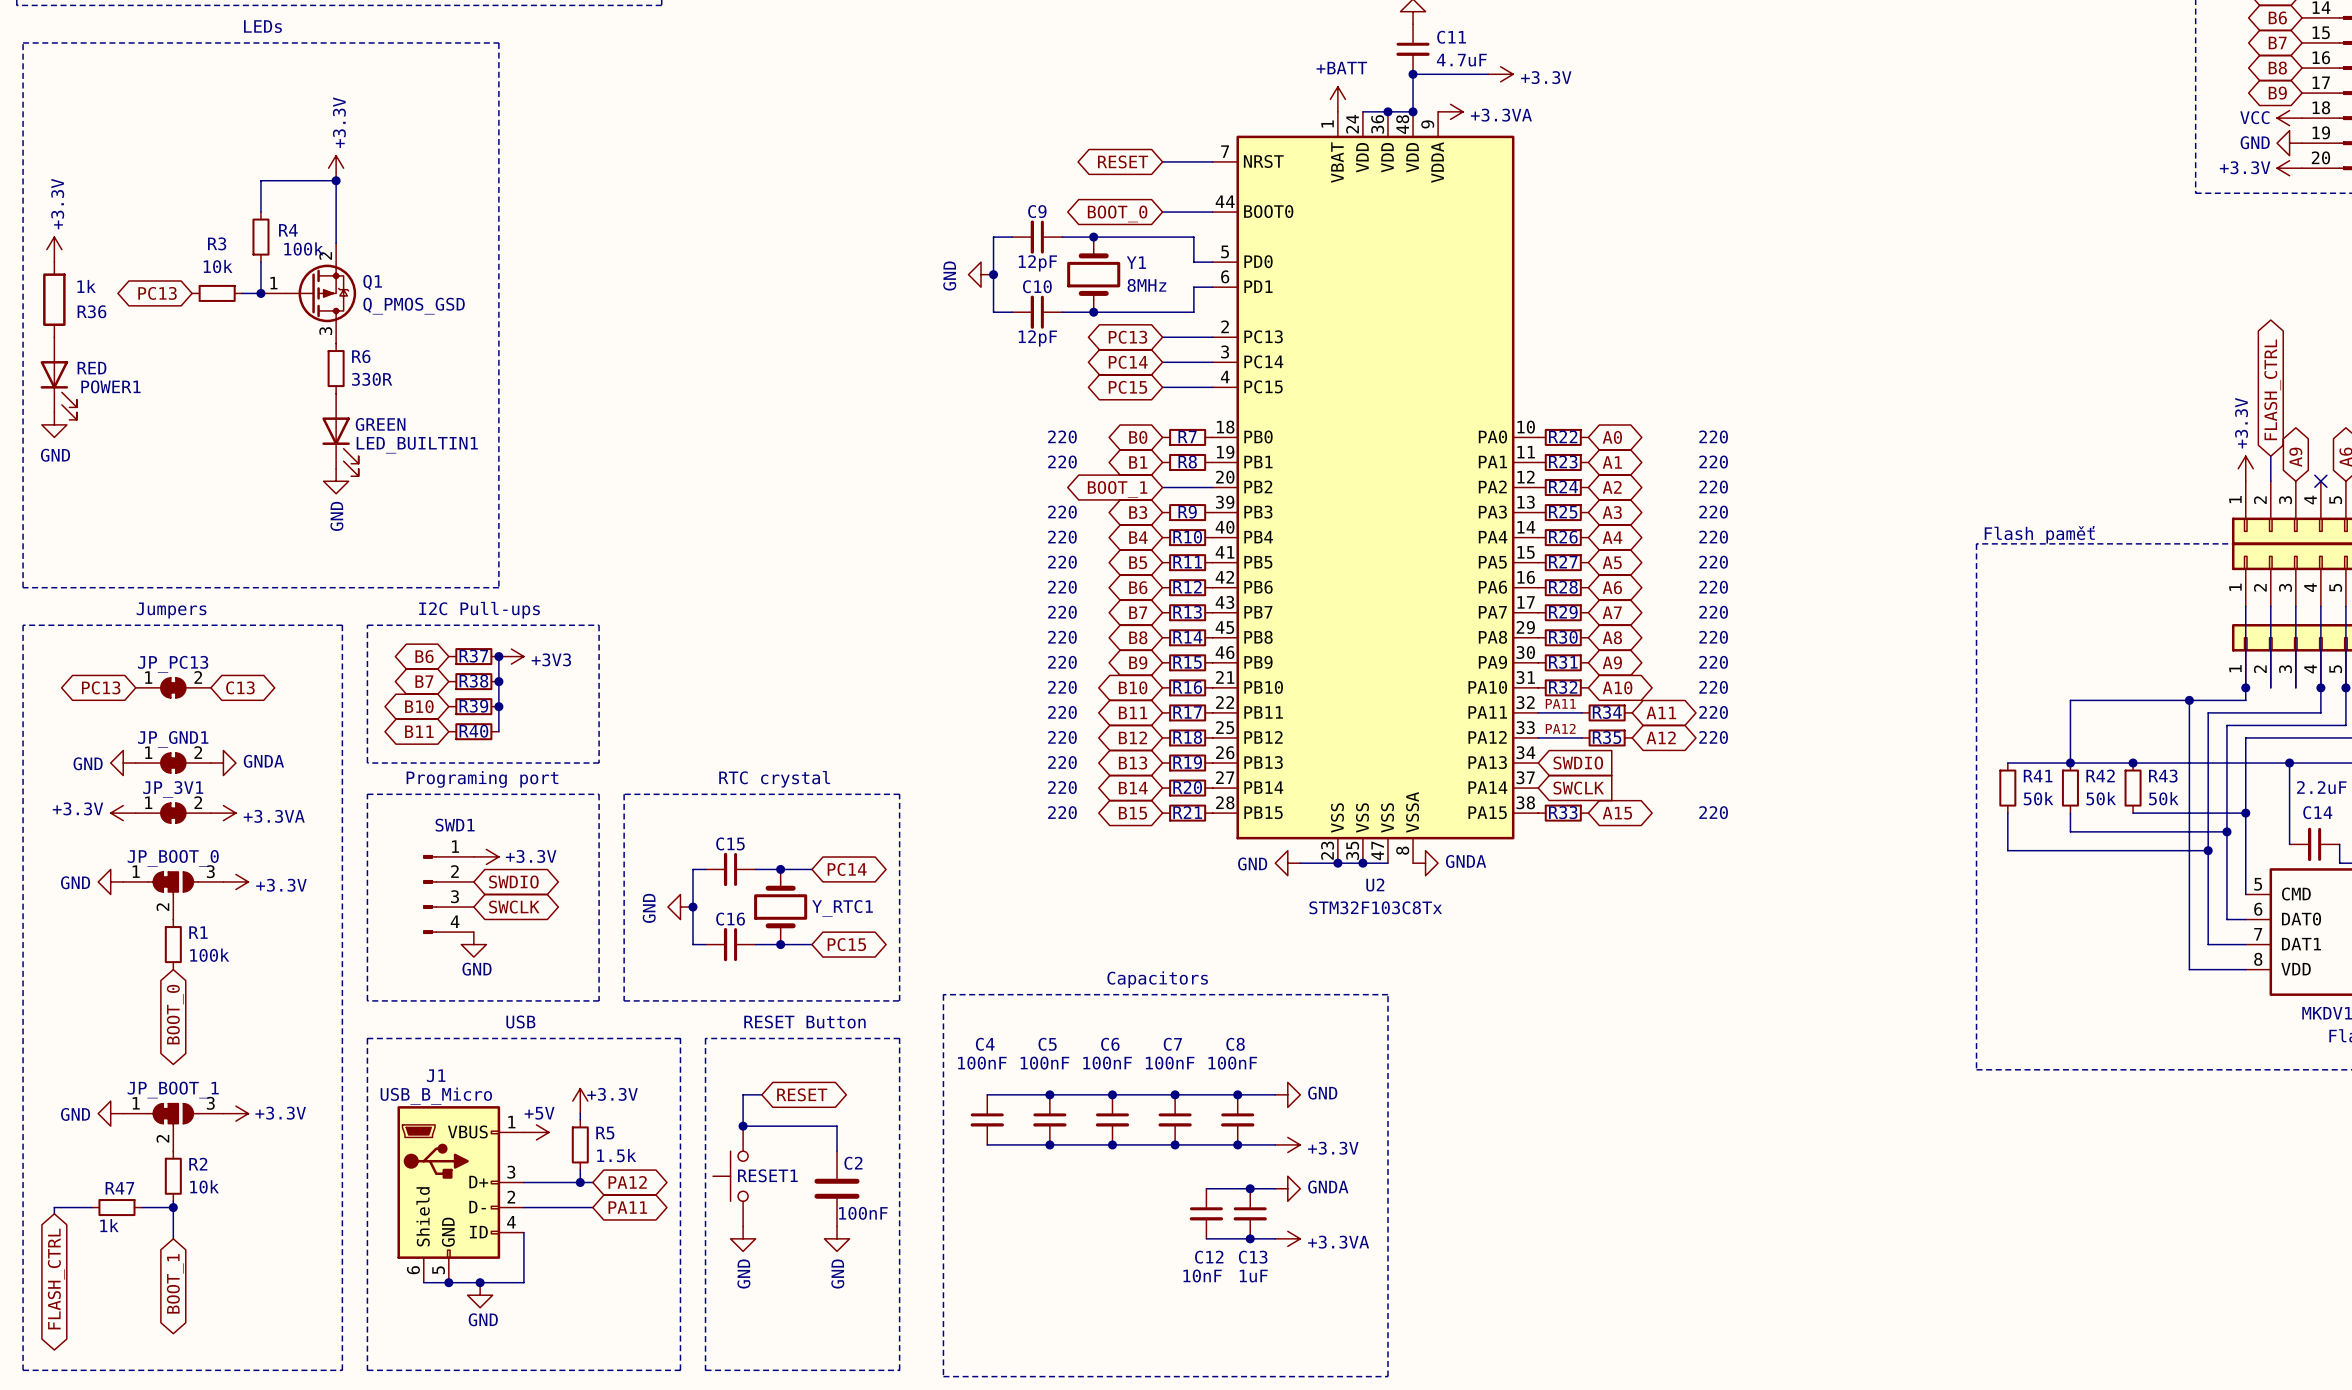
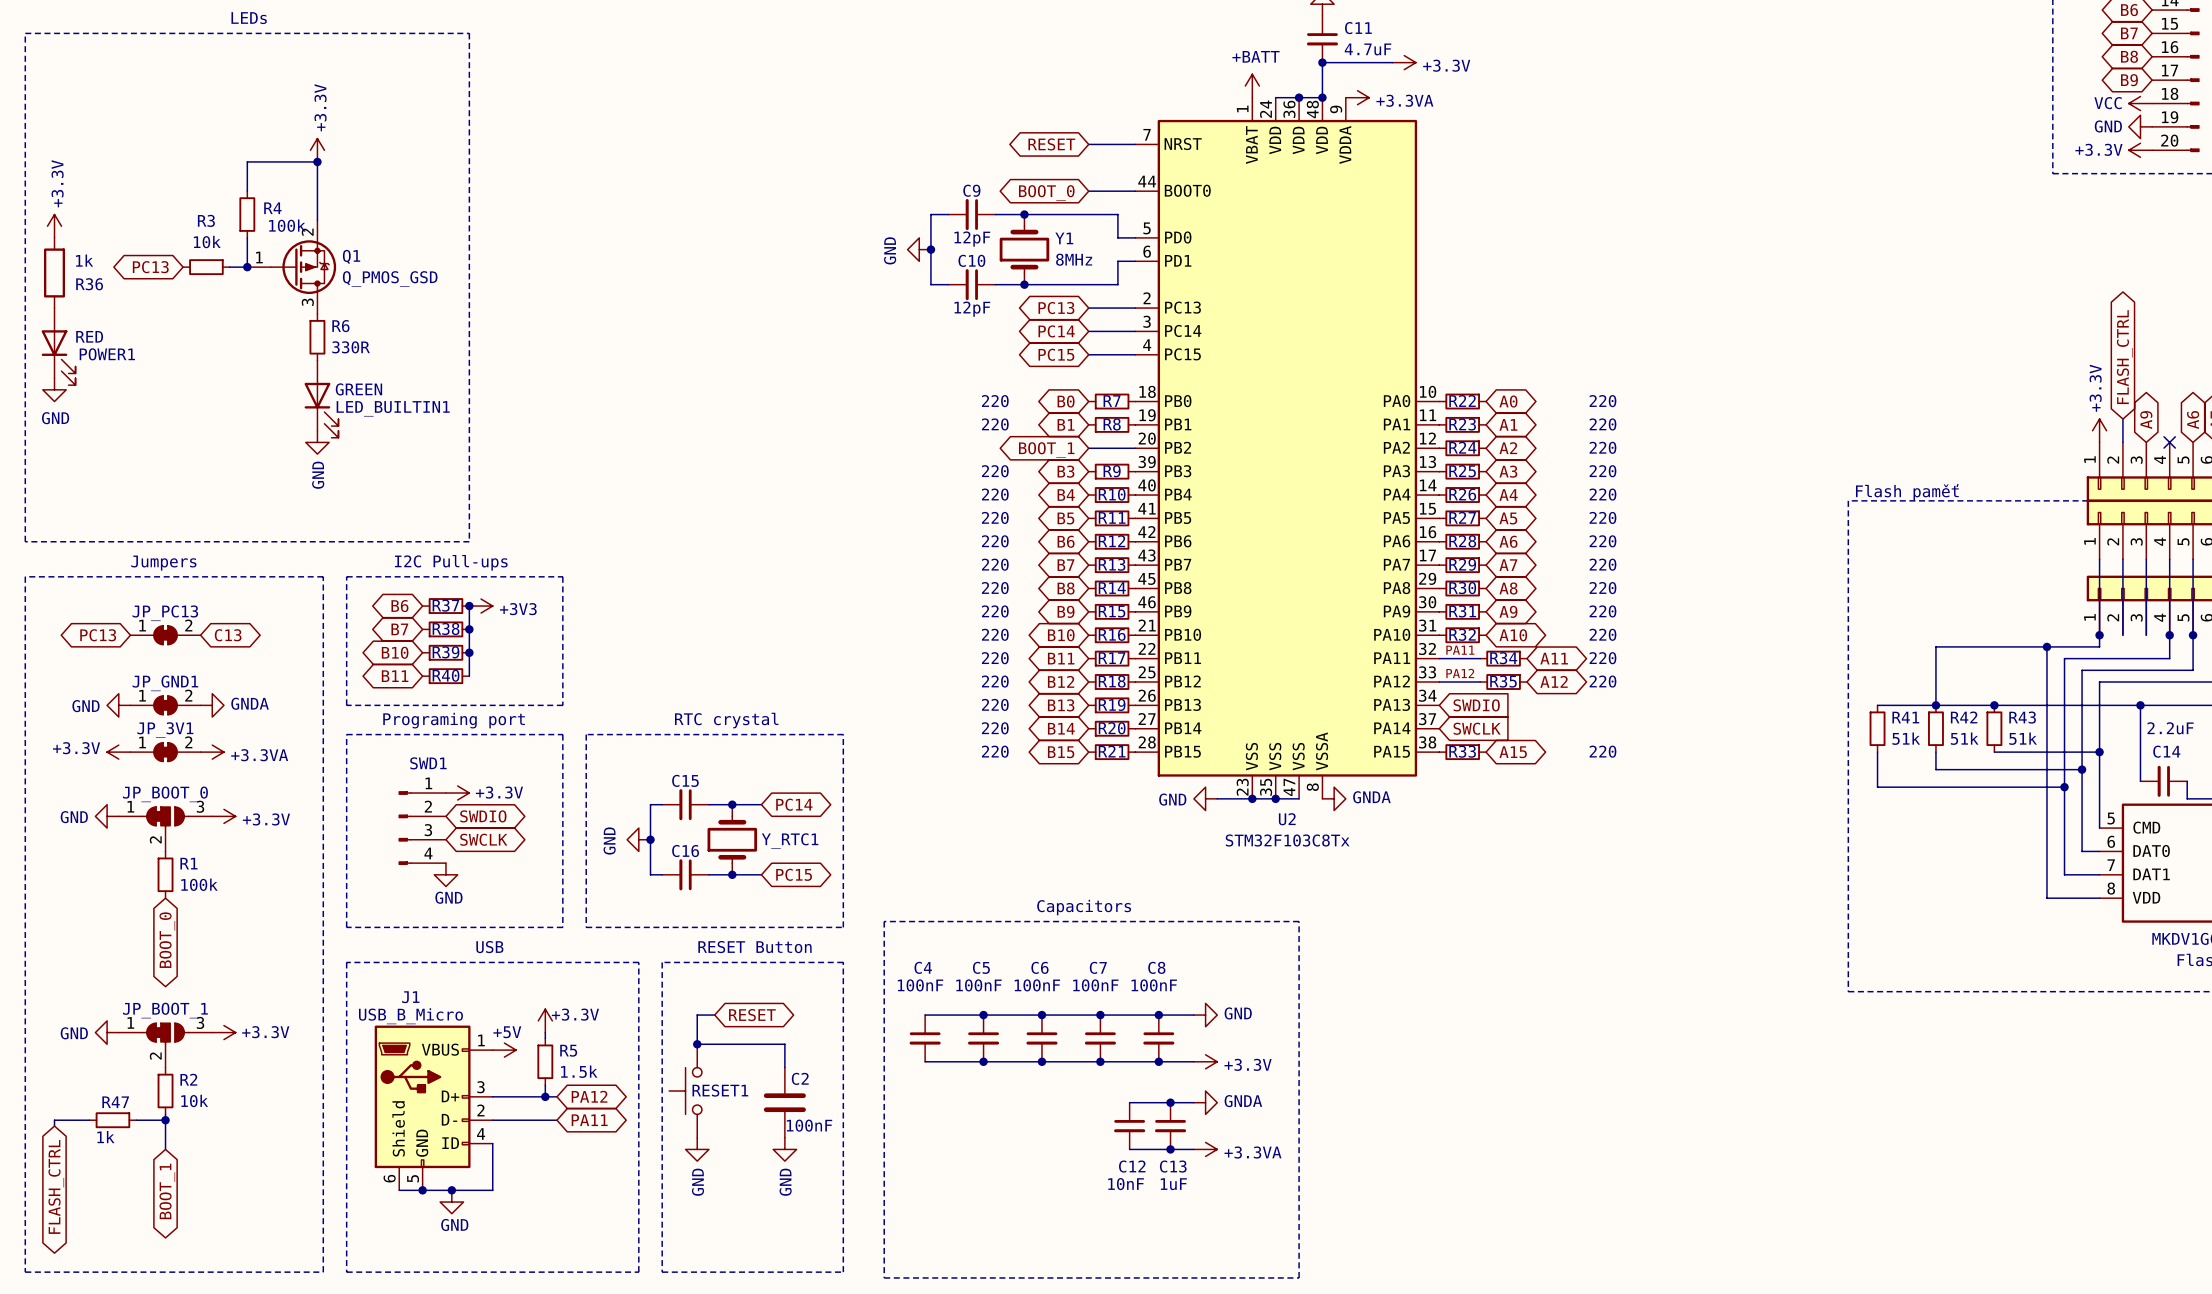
R41 value: 50k (2038, 798) -> 51k (1906, 738)
R42 value: 50k (2101, 798) -> 51k (1964, 738)
R43 value: 50k (2163, 798) -> 51k (2023, 738)

